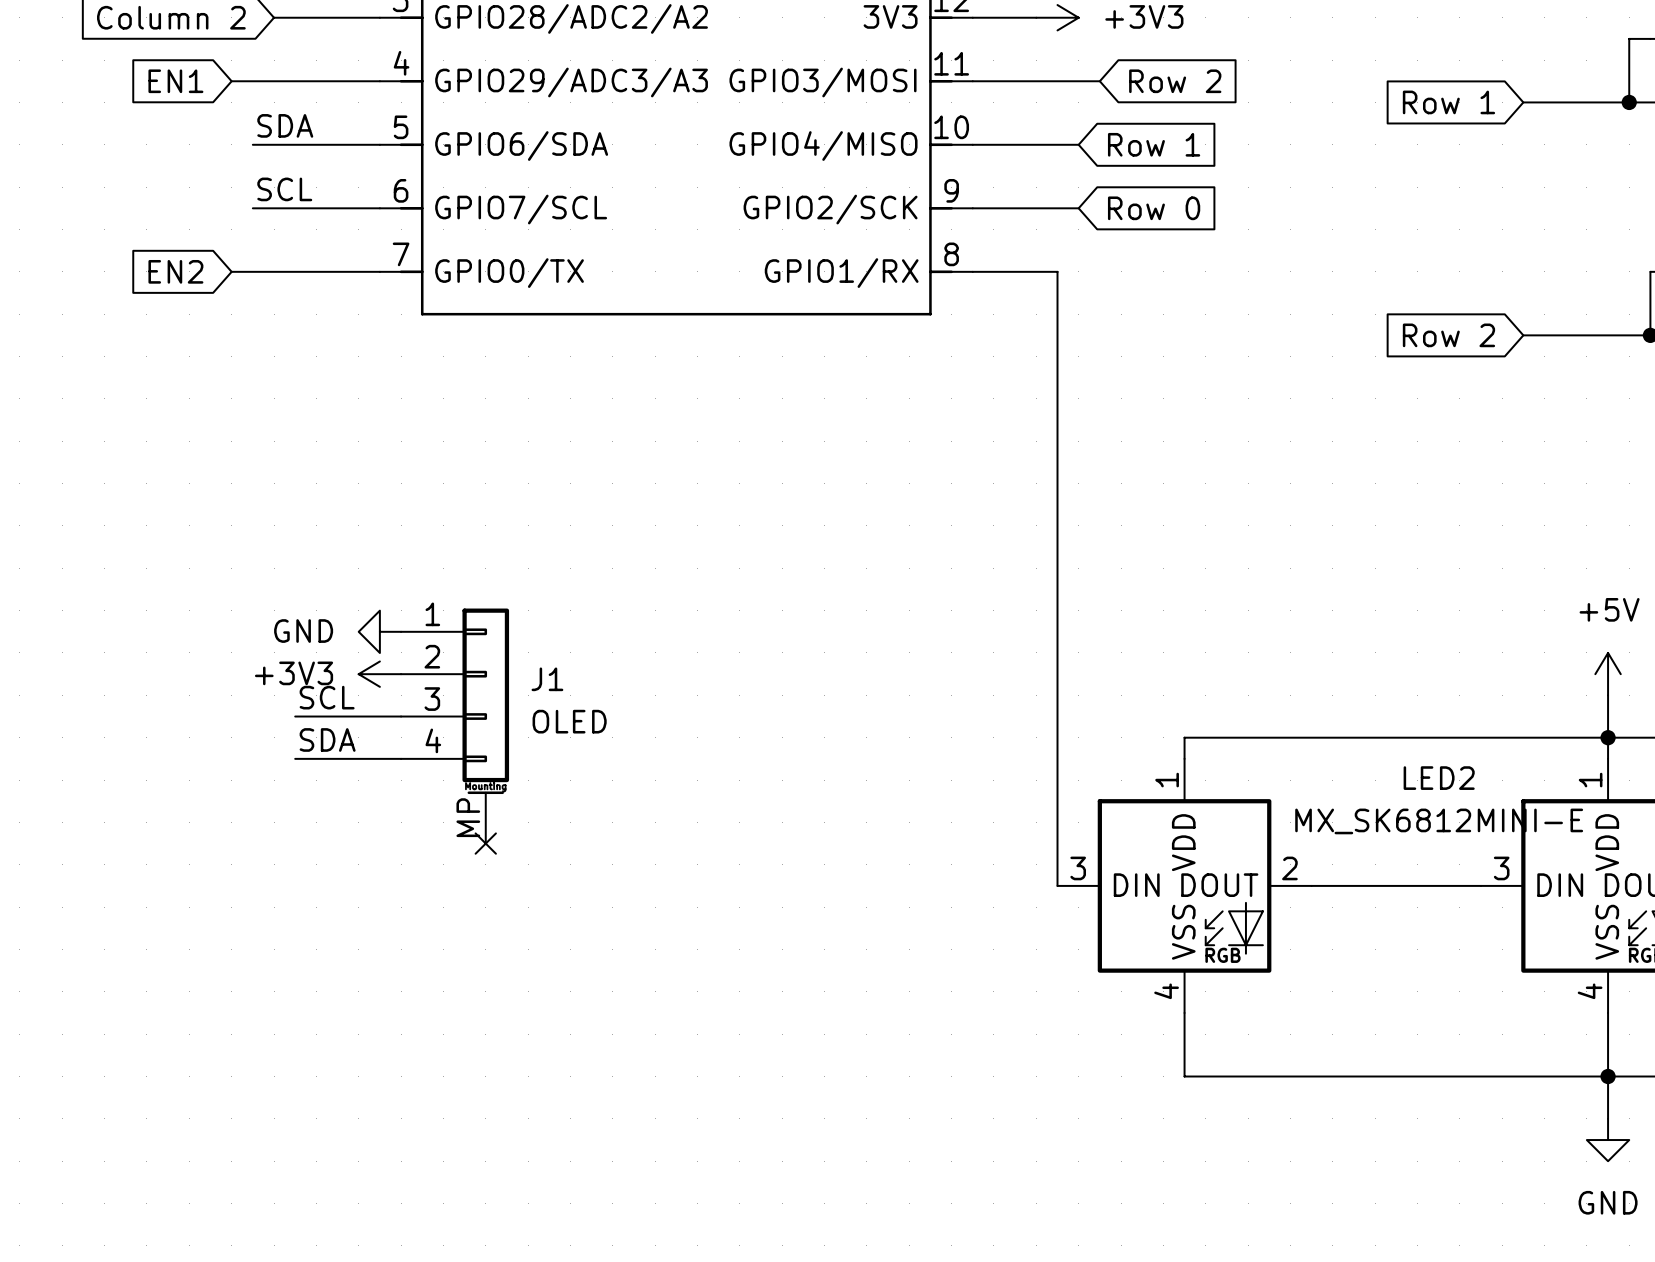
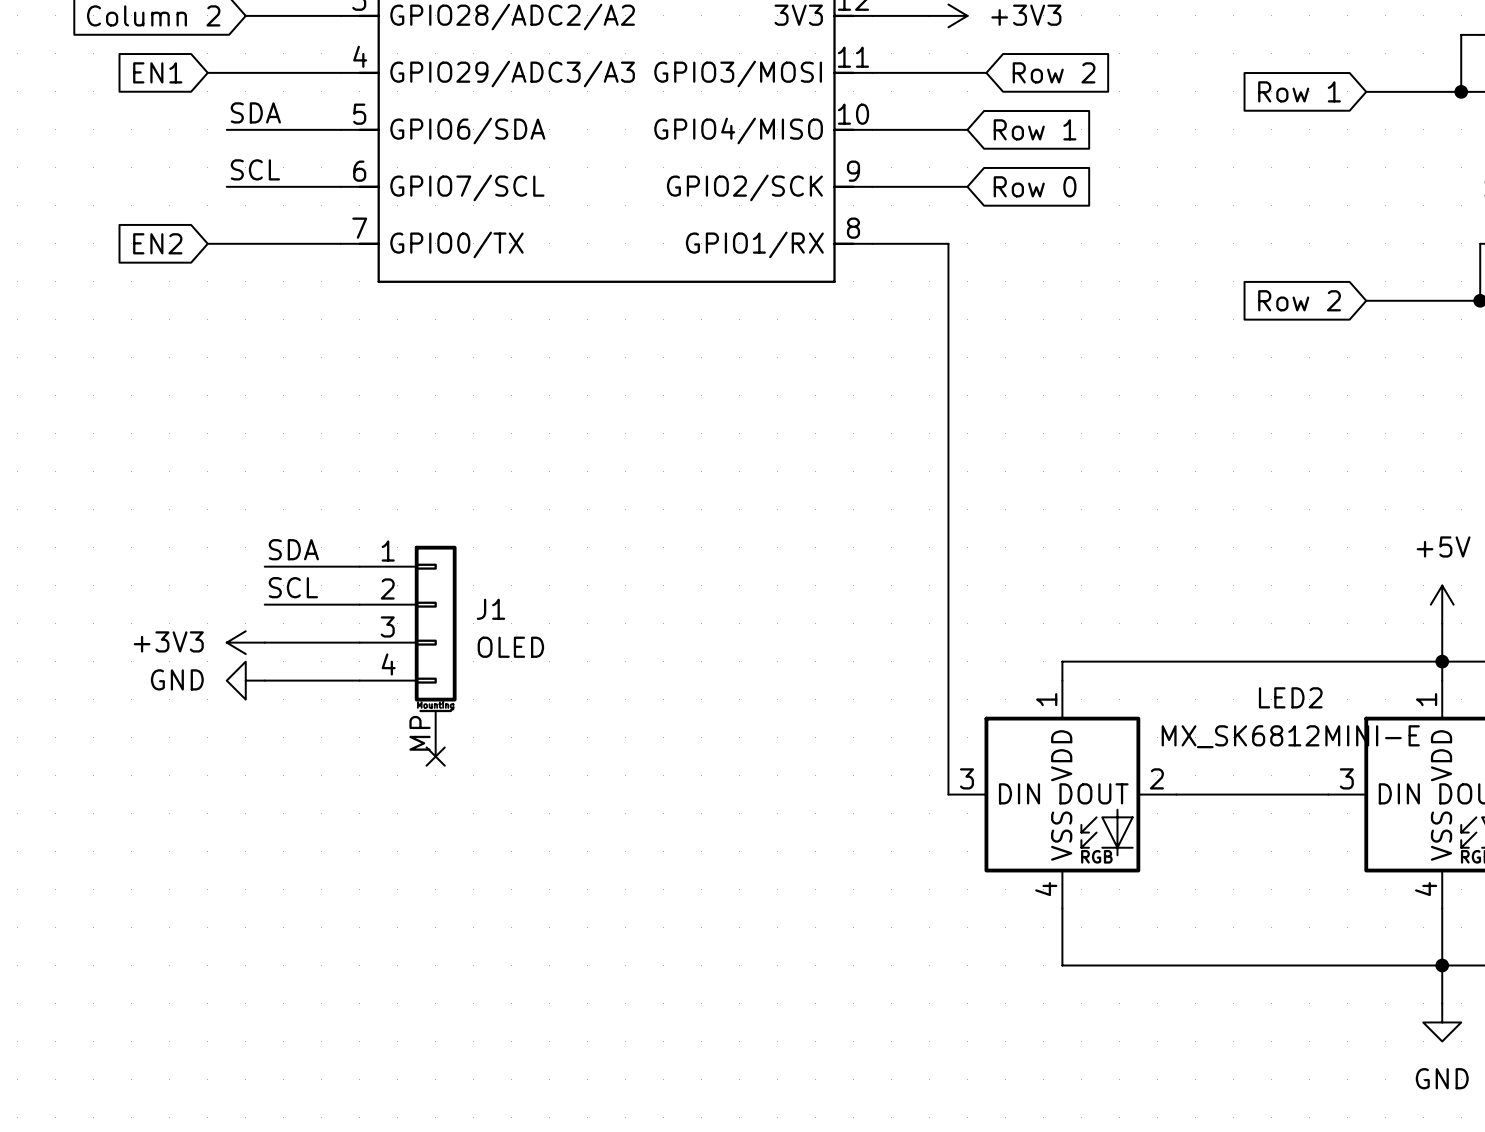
wire: none -> (264, 566) (359, 566)
power symbol position: GND (379, 631) -> GND (245, 680)
wire: none -> (264, 604) (359, 604)
power symbol position: +3V3 (379, 674) -> +3V3 (245, 642)
label position: SCL (327, 697) -> SCL (293, 587)
label position: SDA (327, 739) -> SDA (293, 549)

